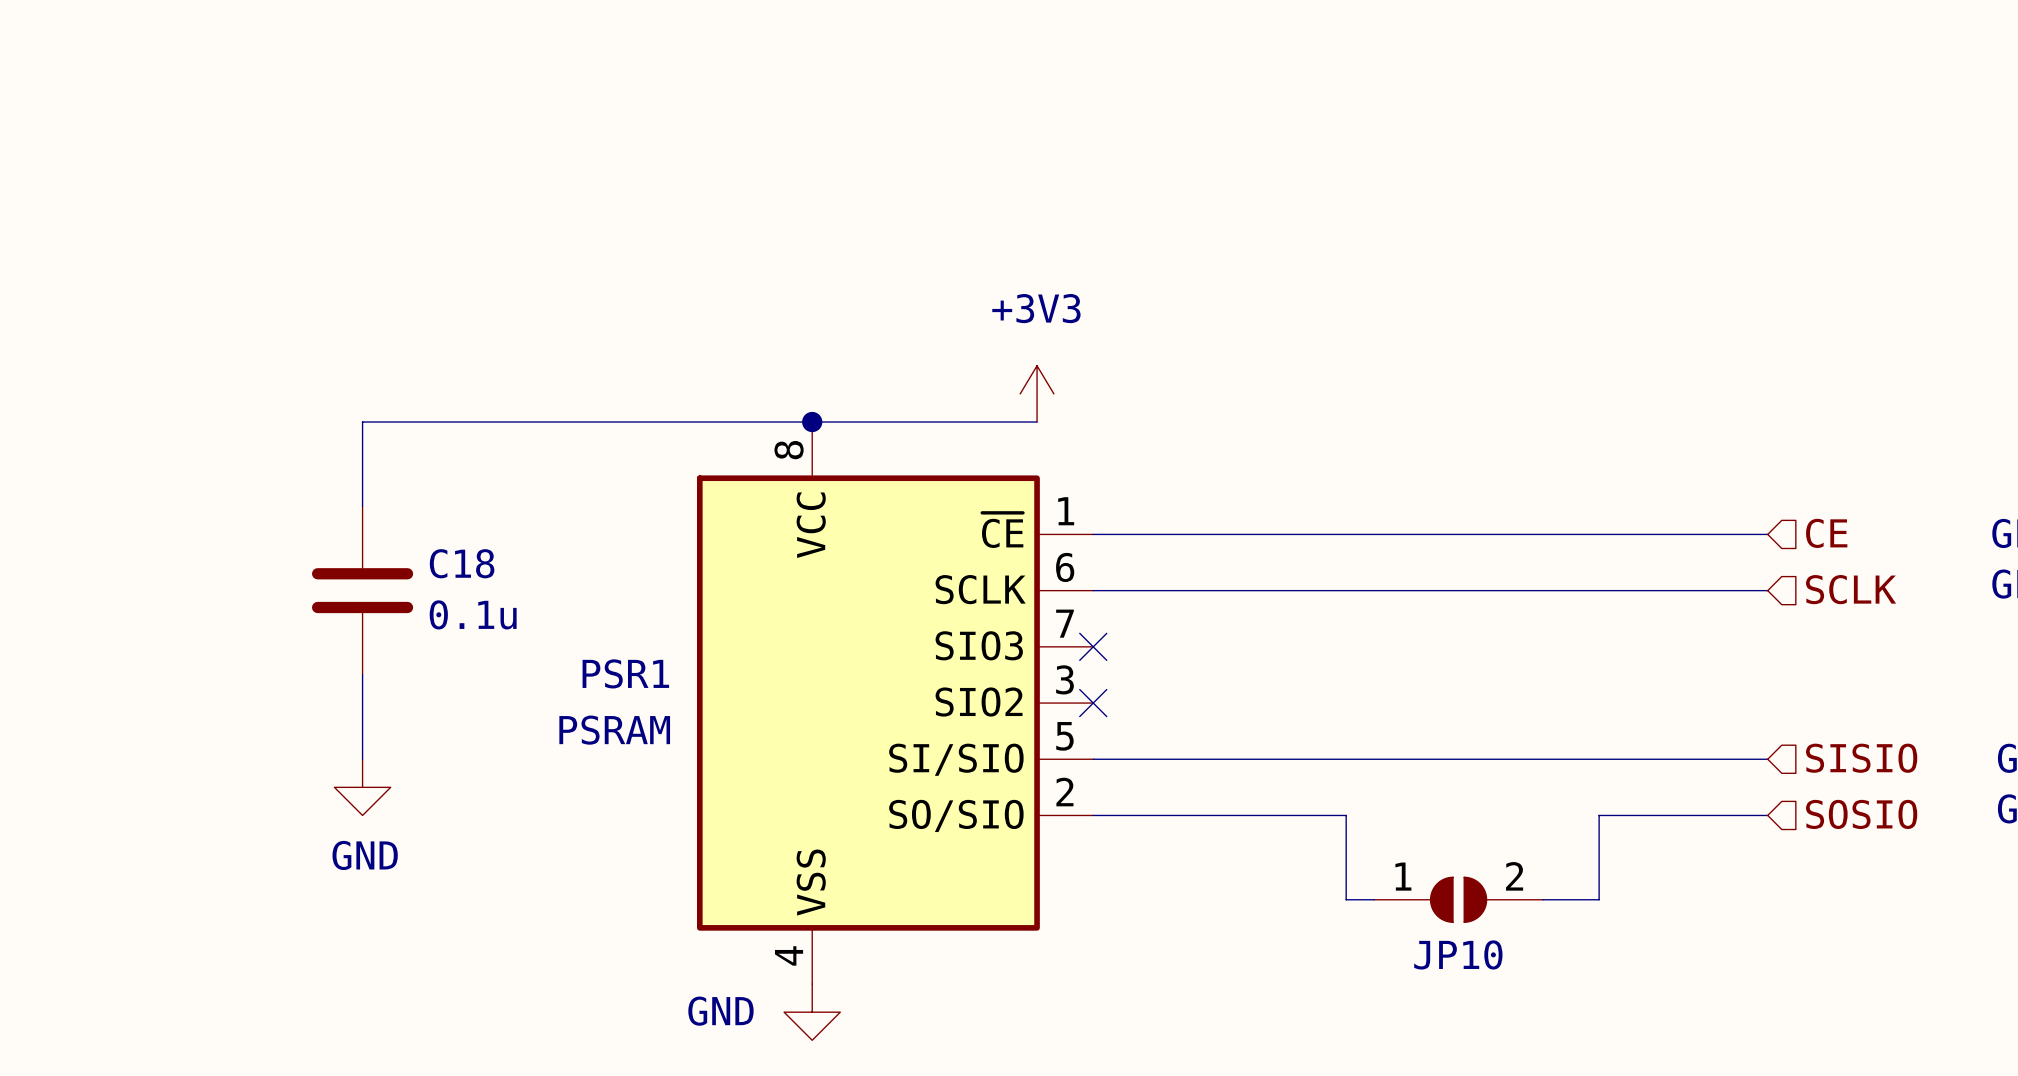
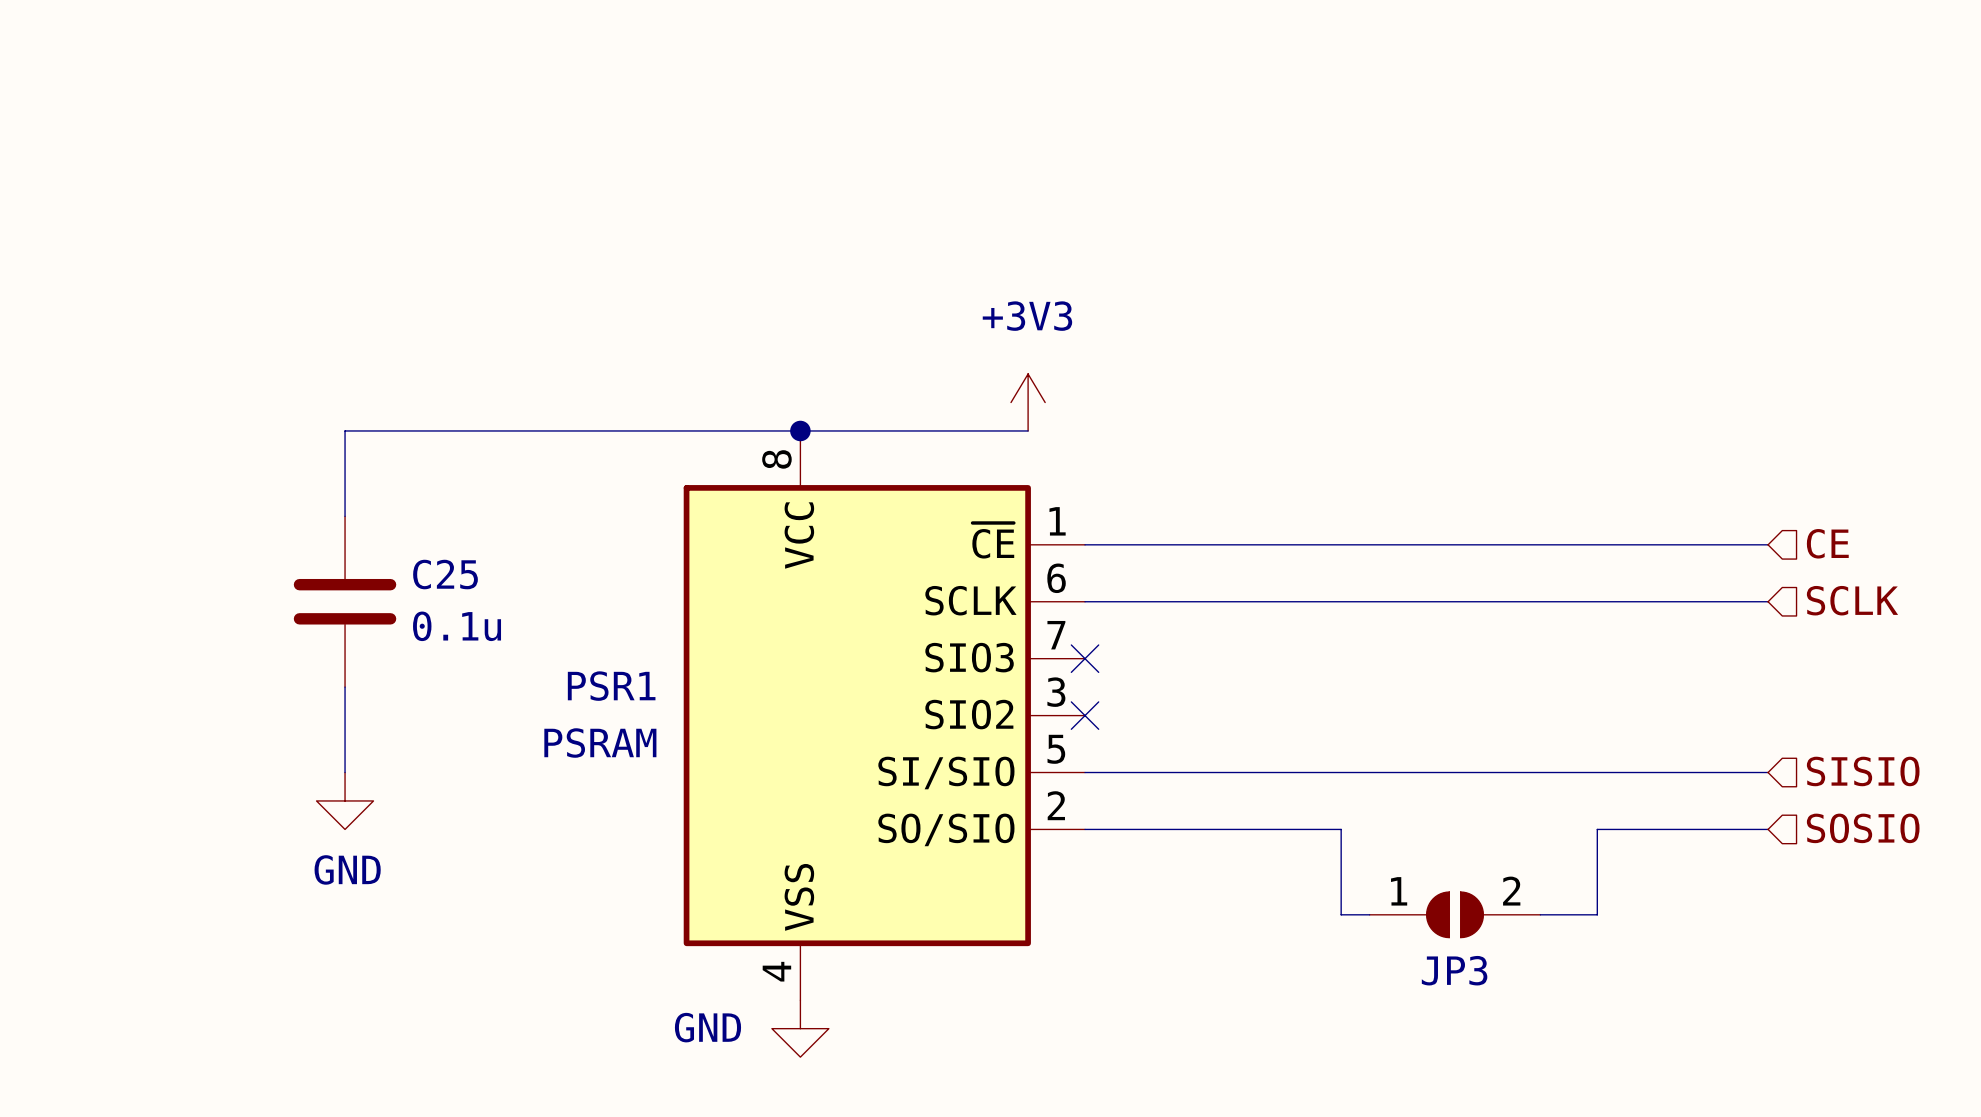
C18 name: C18 (462, 563) -> C25 (445, 574)
JP10 name: JP10 (1458, 954) -> JP3 (1454, 970)

